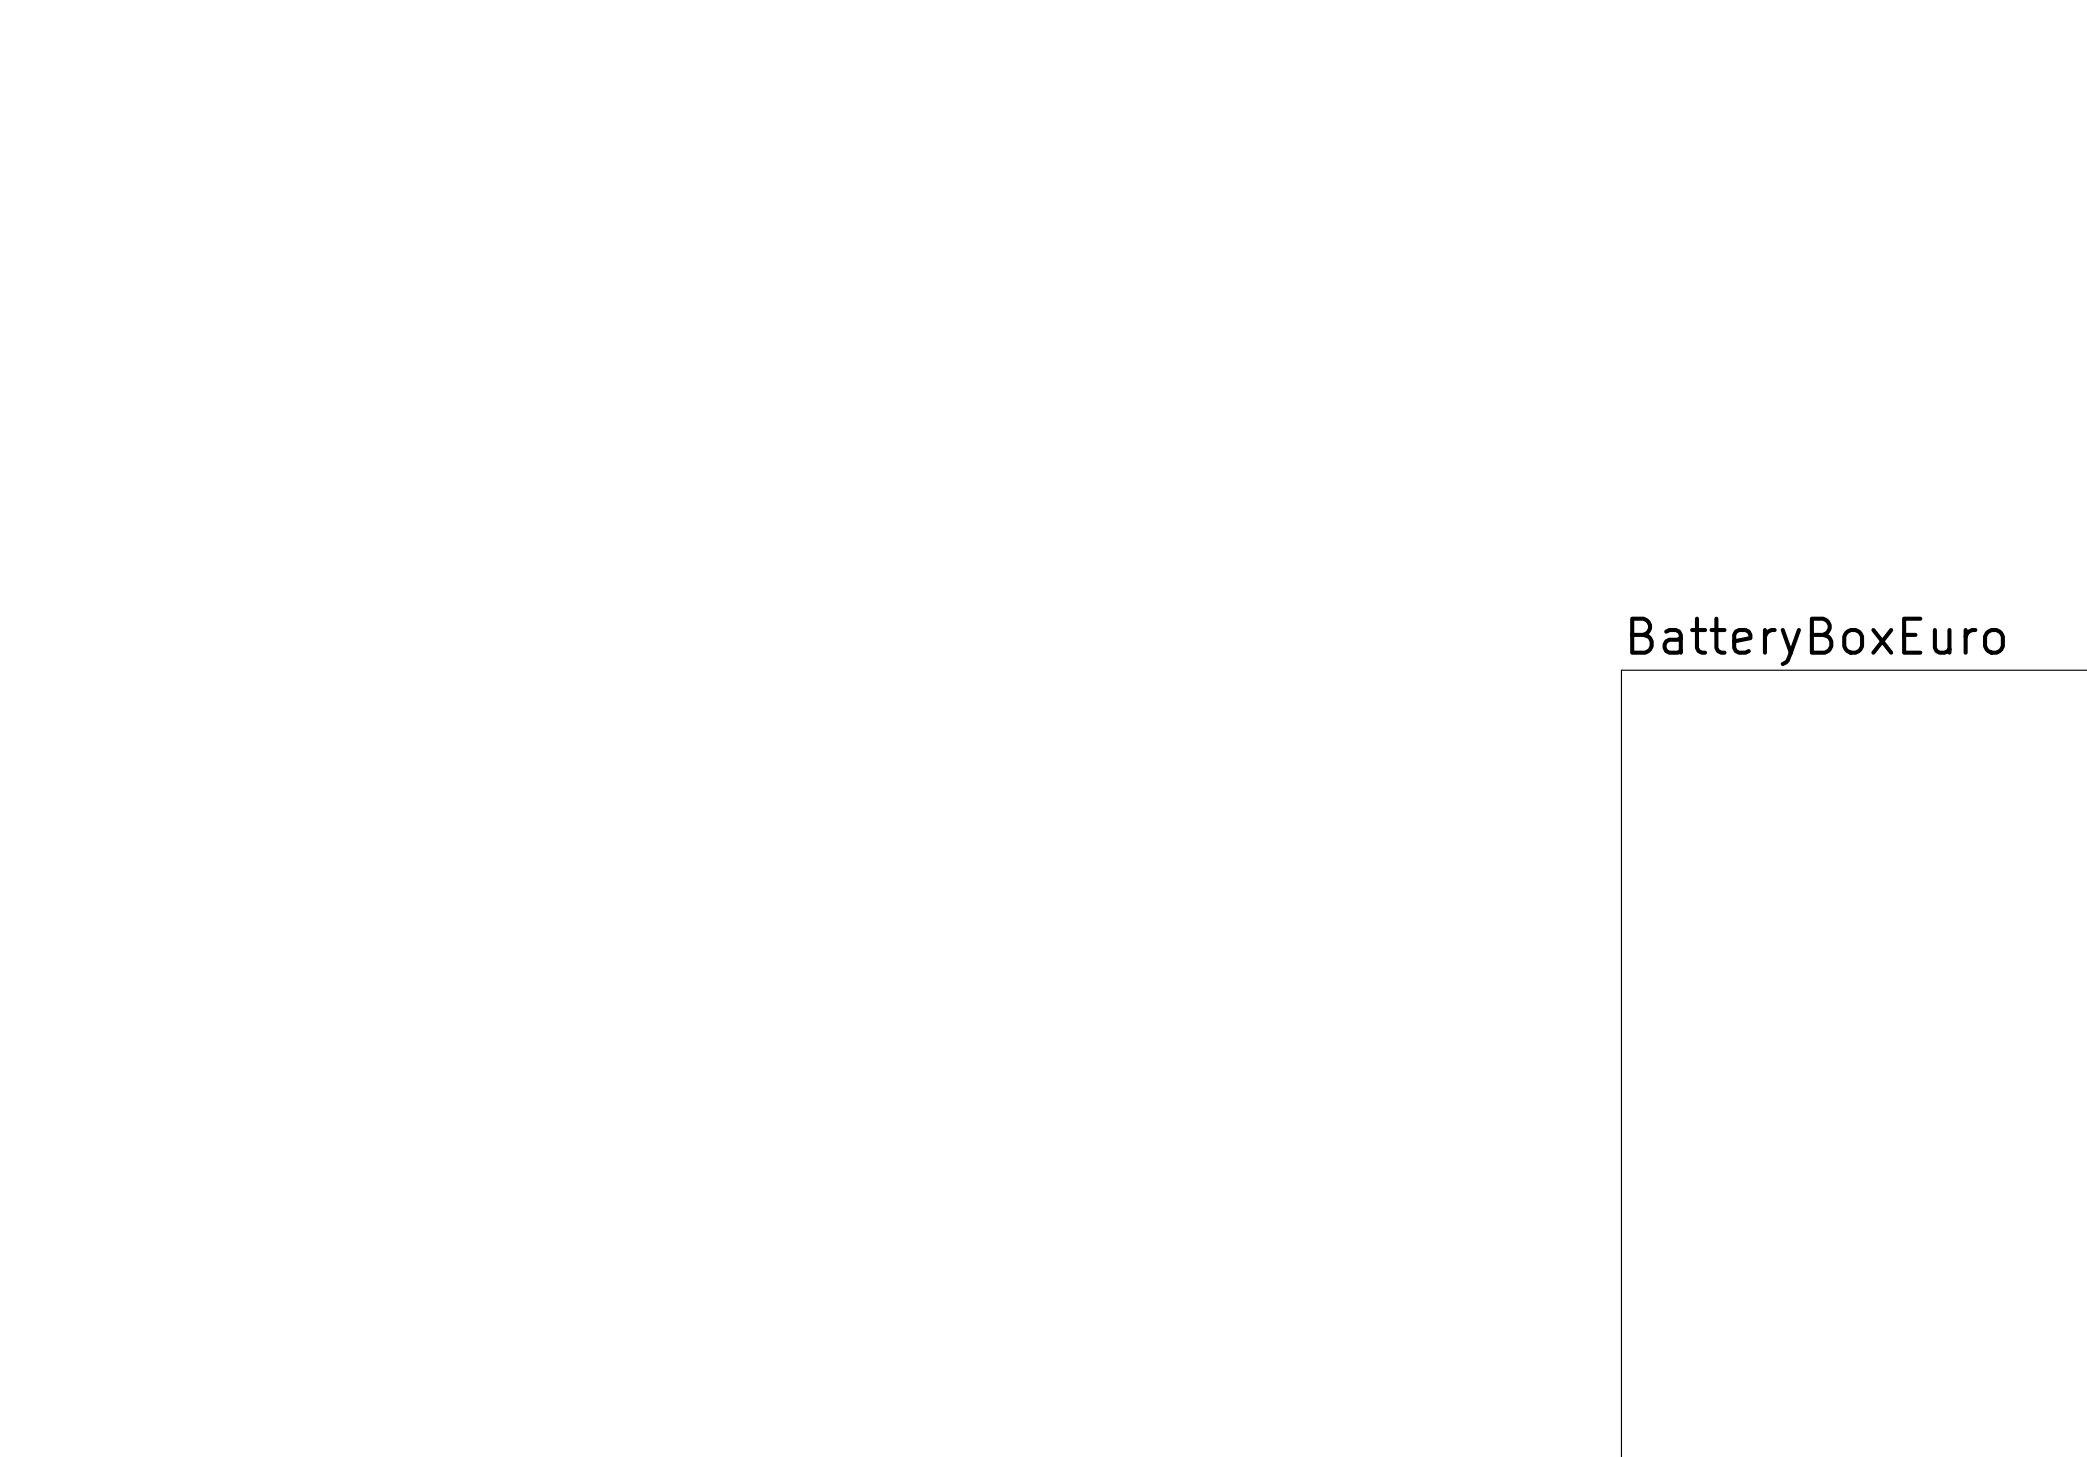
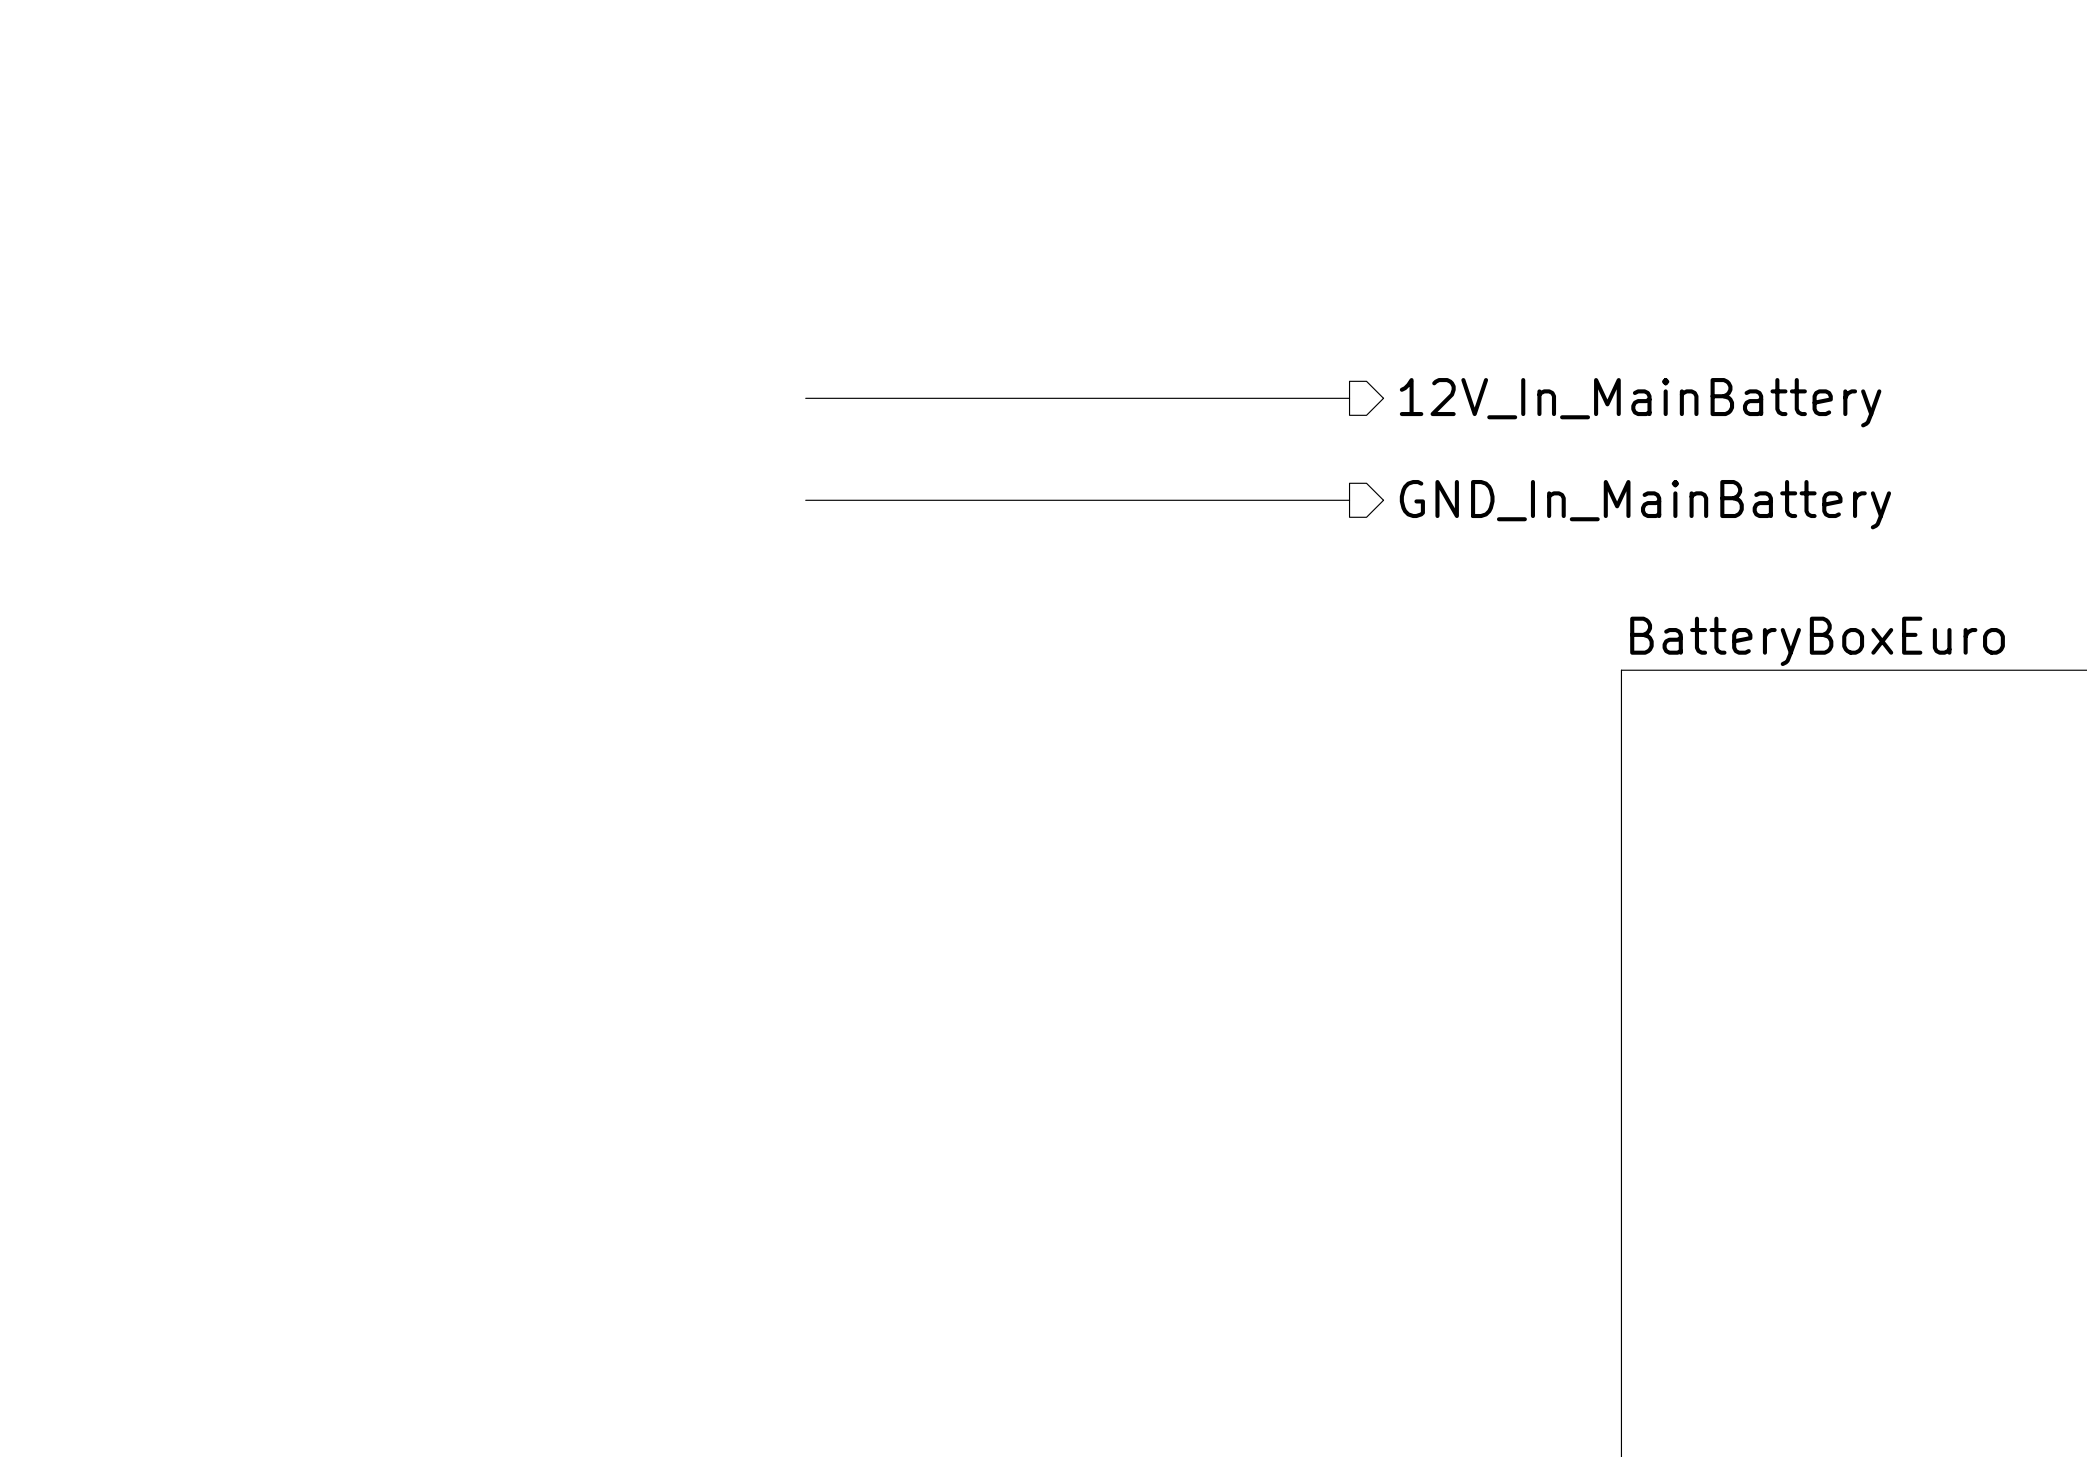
wire: none -> (805, 398) (1349, 398)
sheet pin: none -> 12V_In_MainBattery (1640, 402)
wire: none -> (805, 500) (1349, 500)
sheet pin: none -> GND_In_MainBattery (1645, 504)

